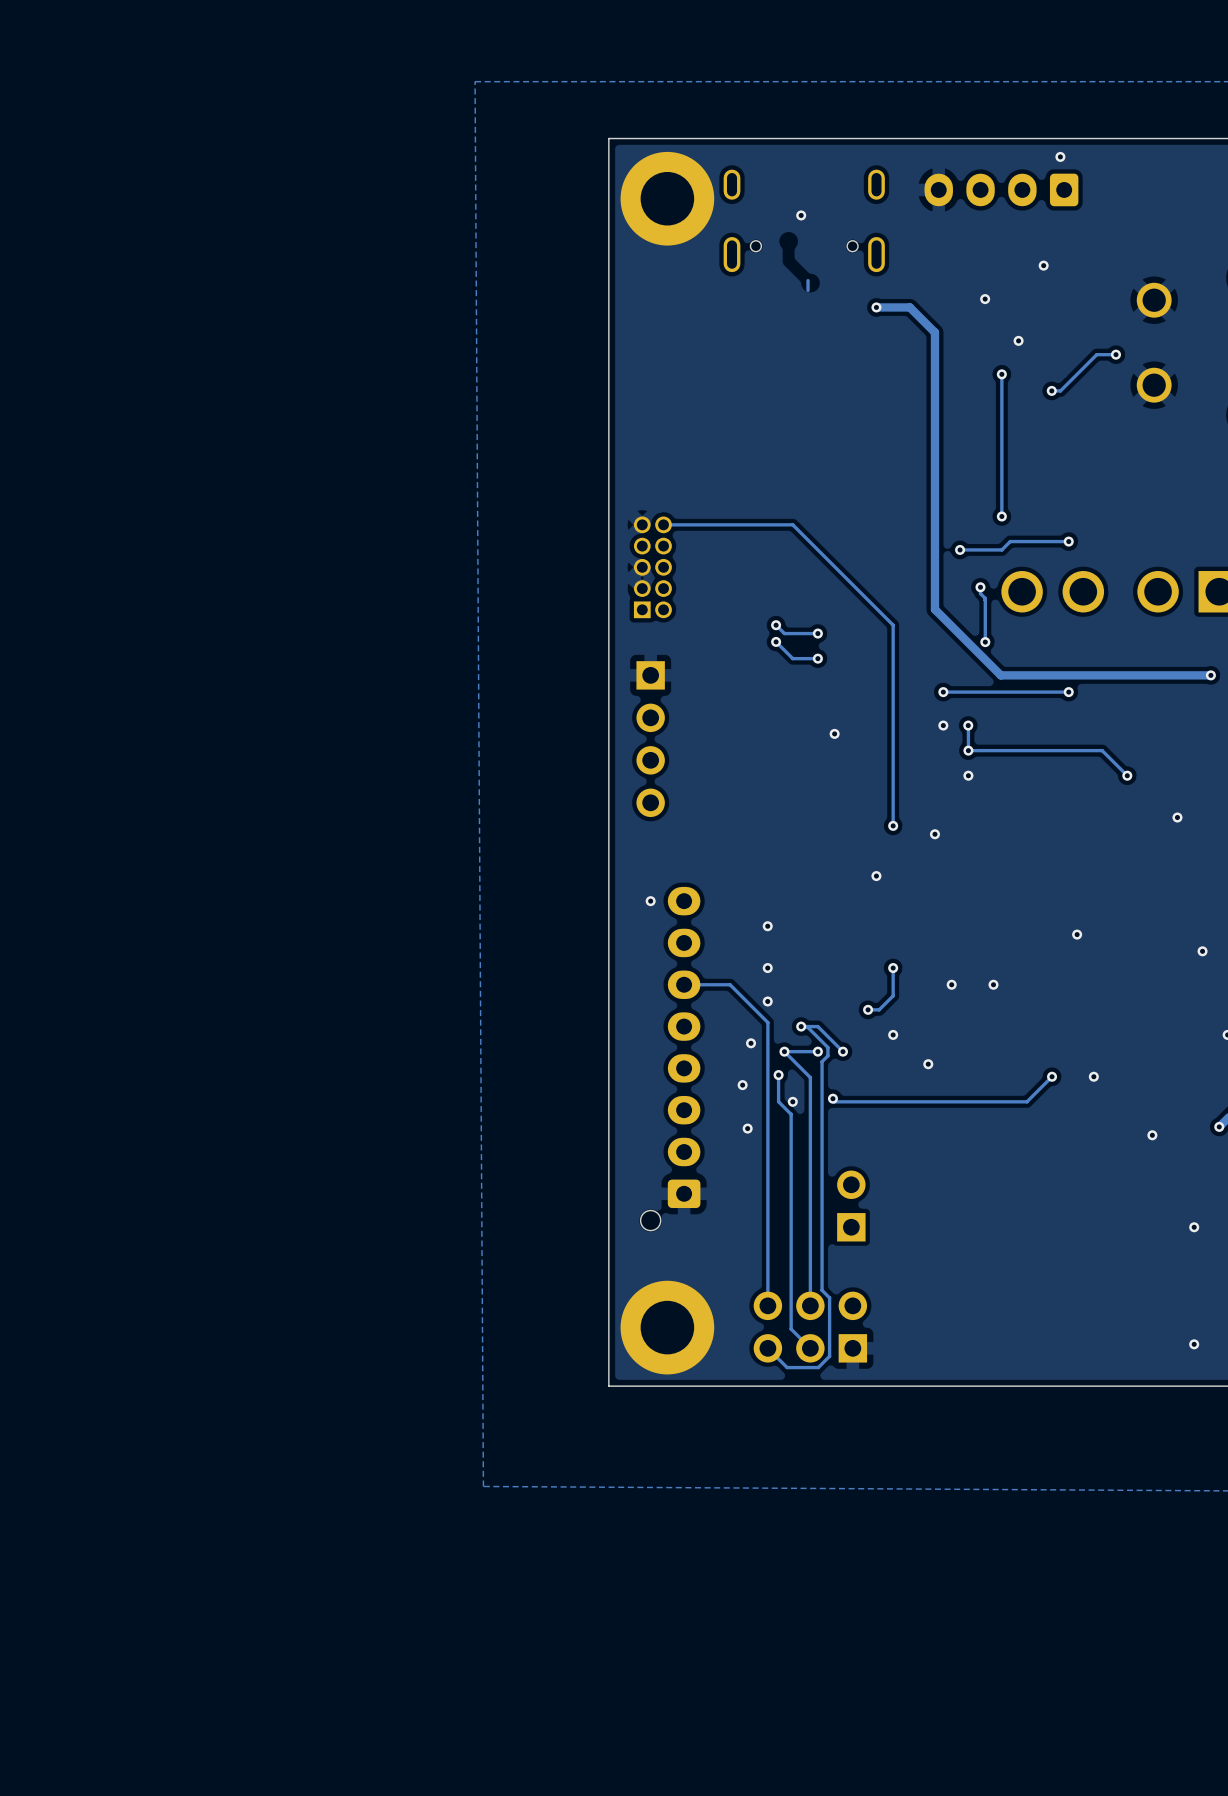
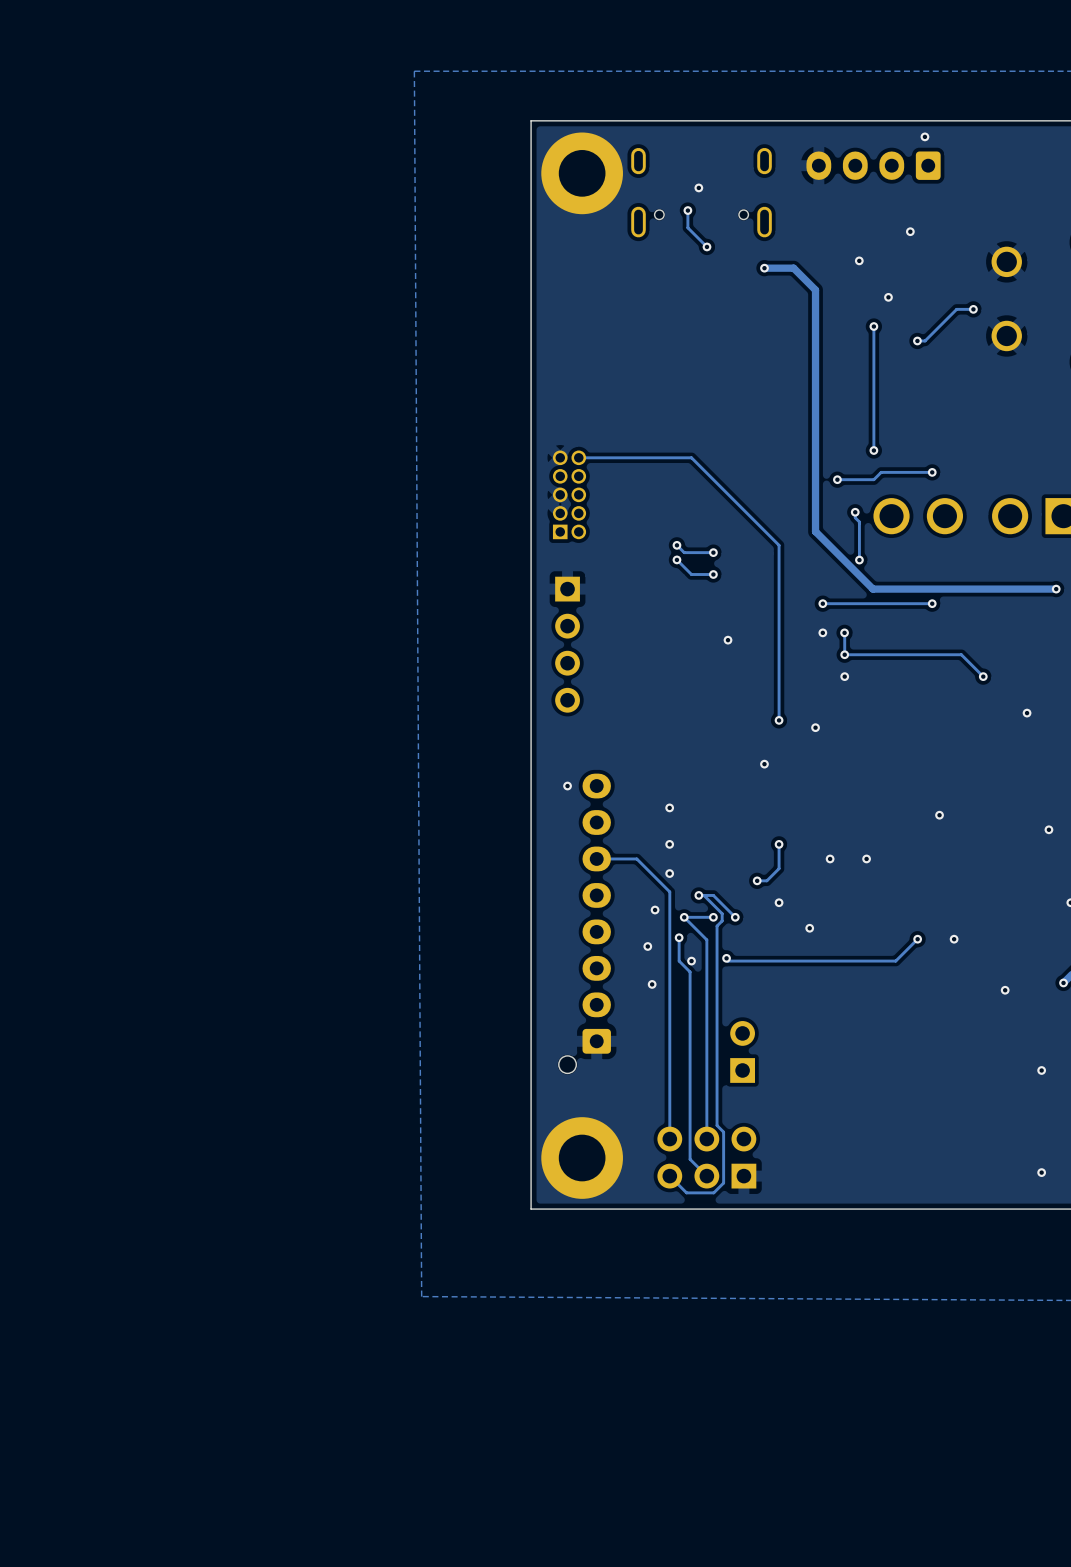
track: none -> (687, 210) (687, 227) (706, 246)
via: none -> (687, 210)
track: (808, 280) (808, 290) -> none
via: none -> (706, 246)

